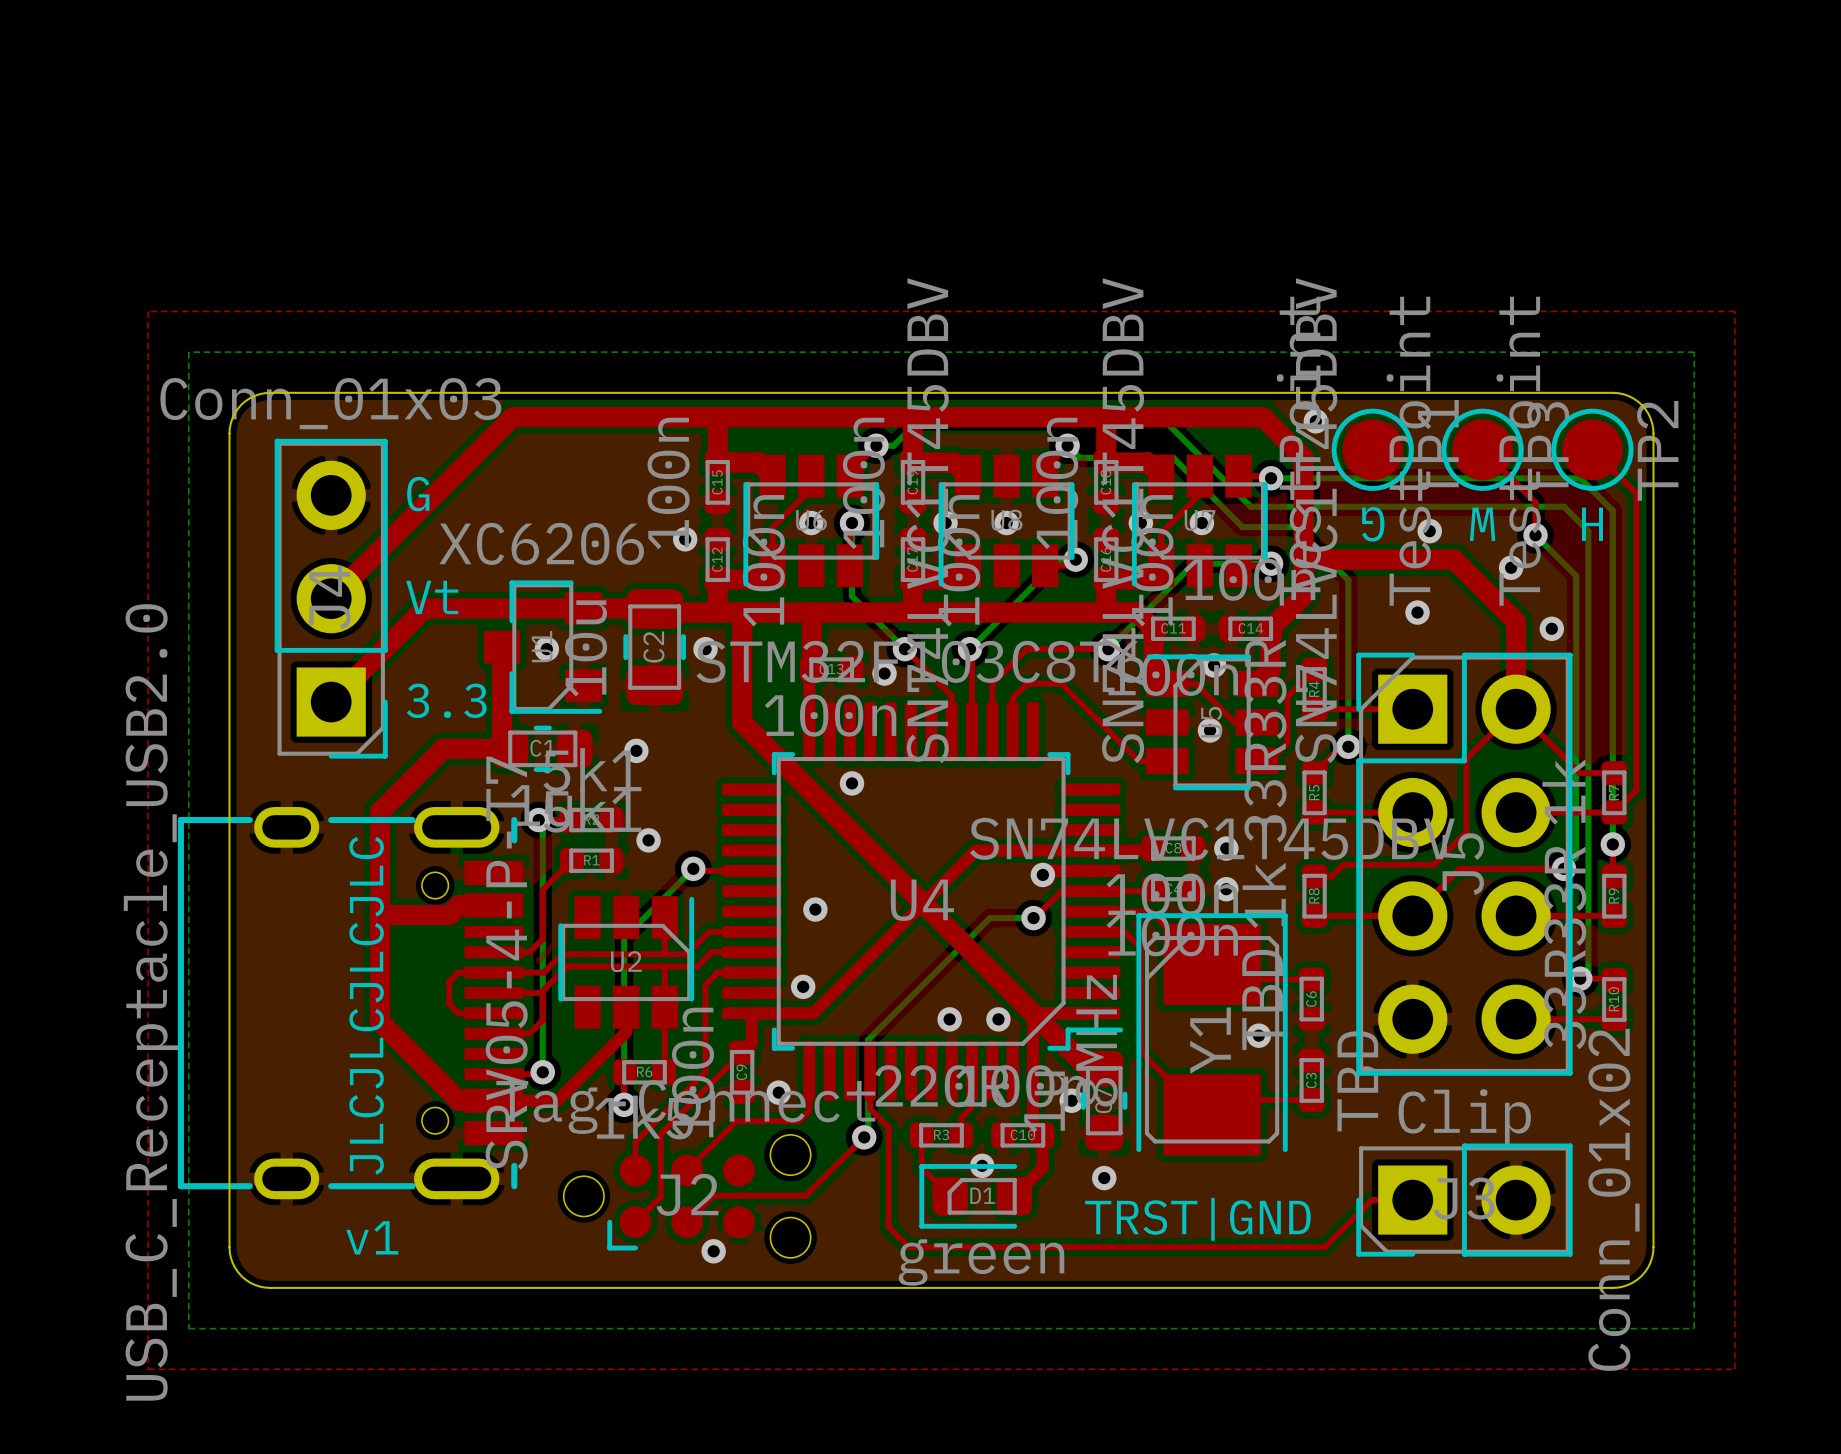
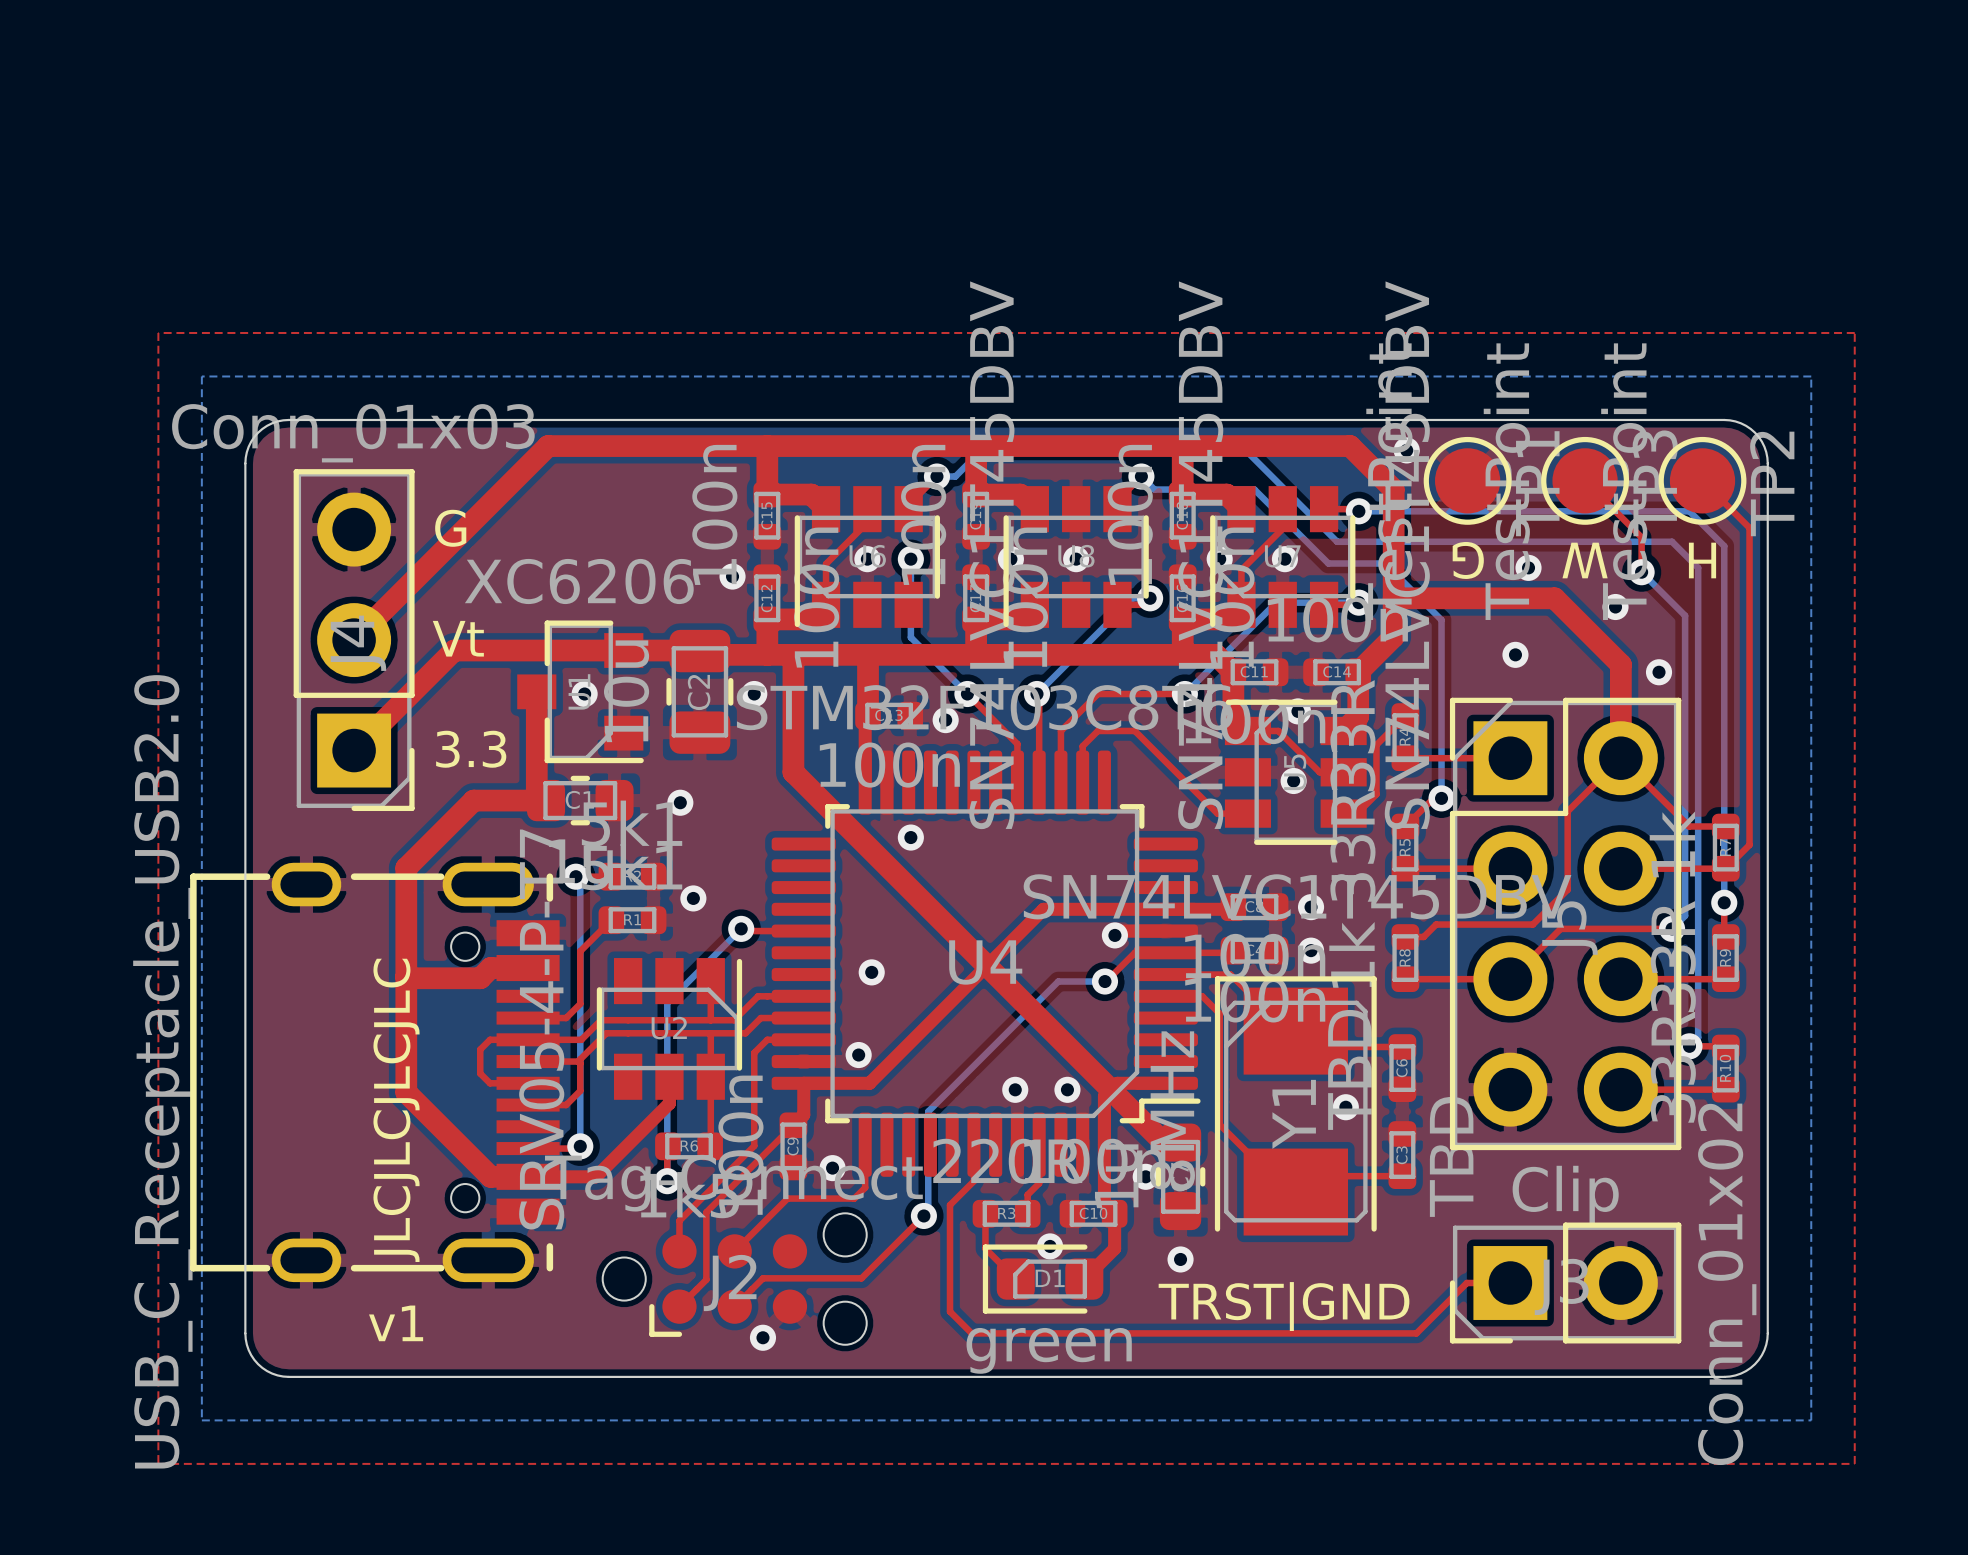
top track: (870, 1070) (870, 1108) (888, 1127) -> (973, 1144) (973, 1181) (950, 1205)

